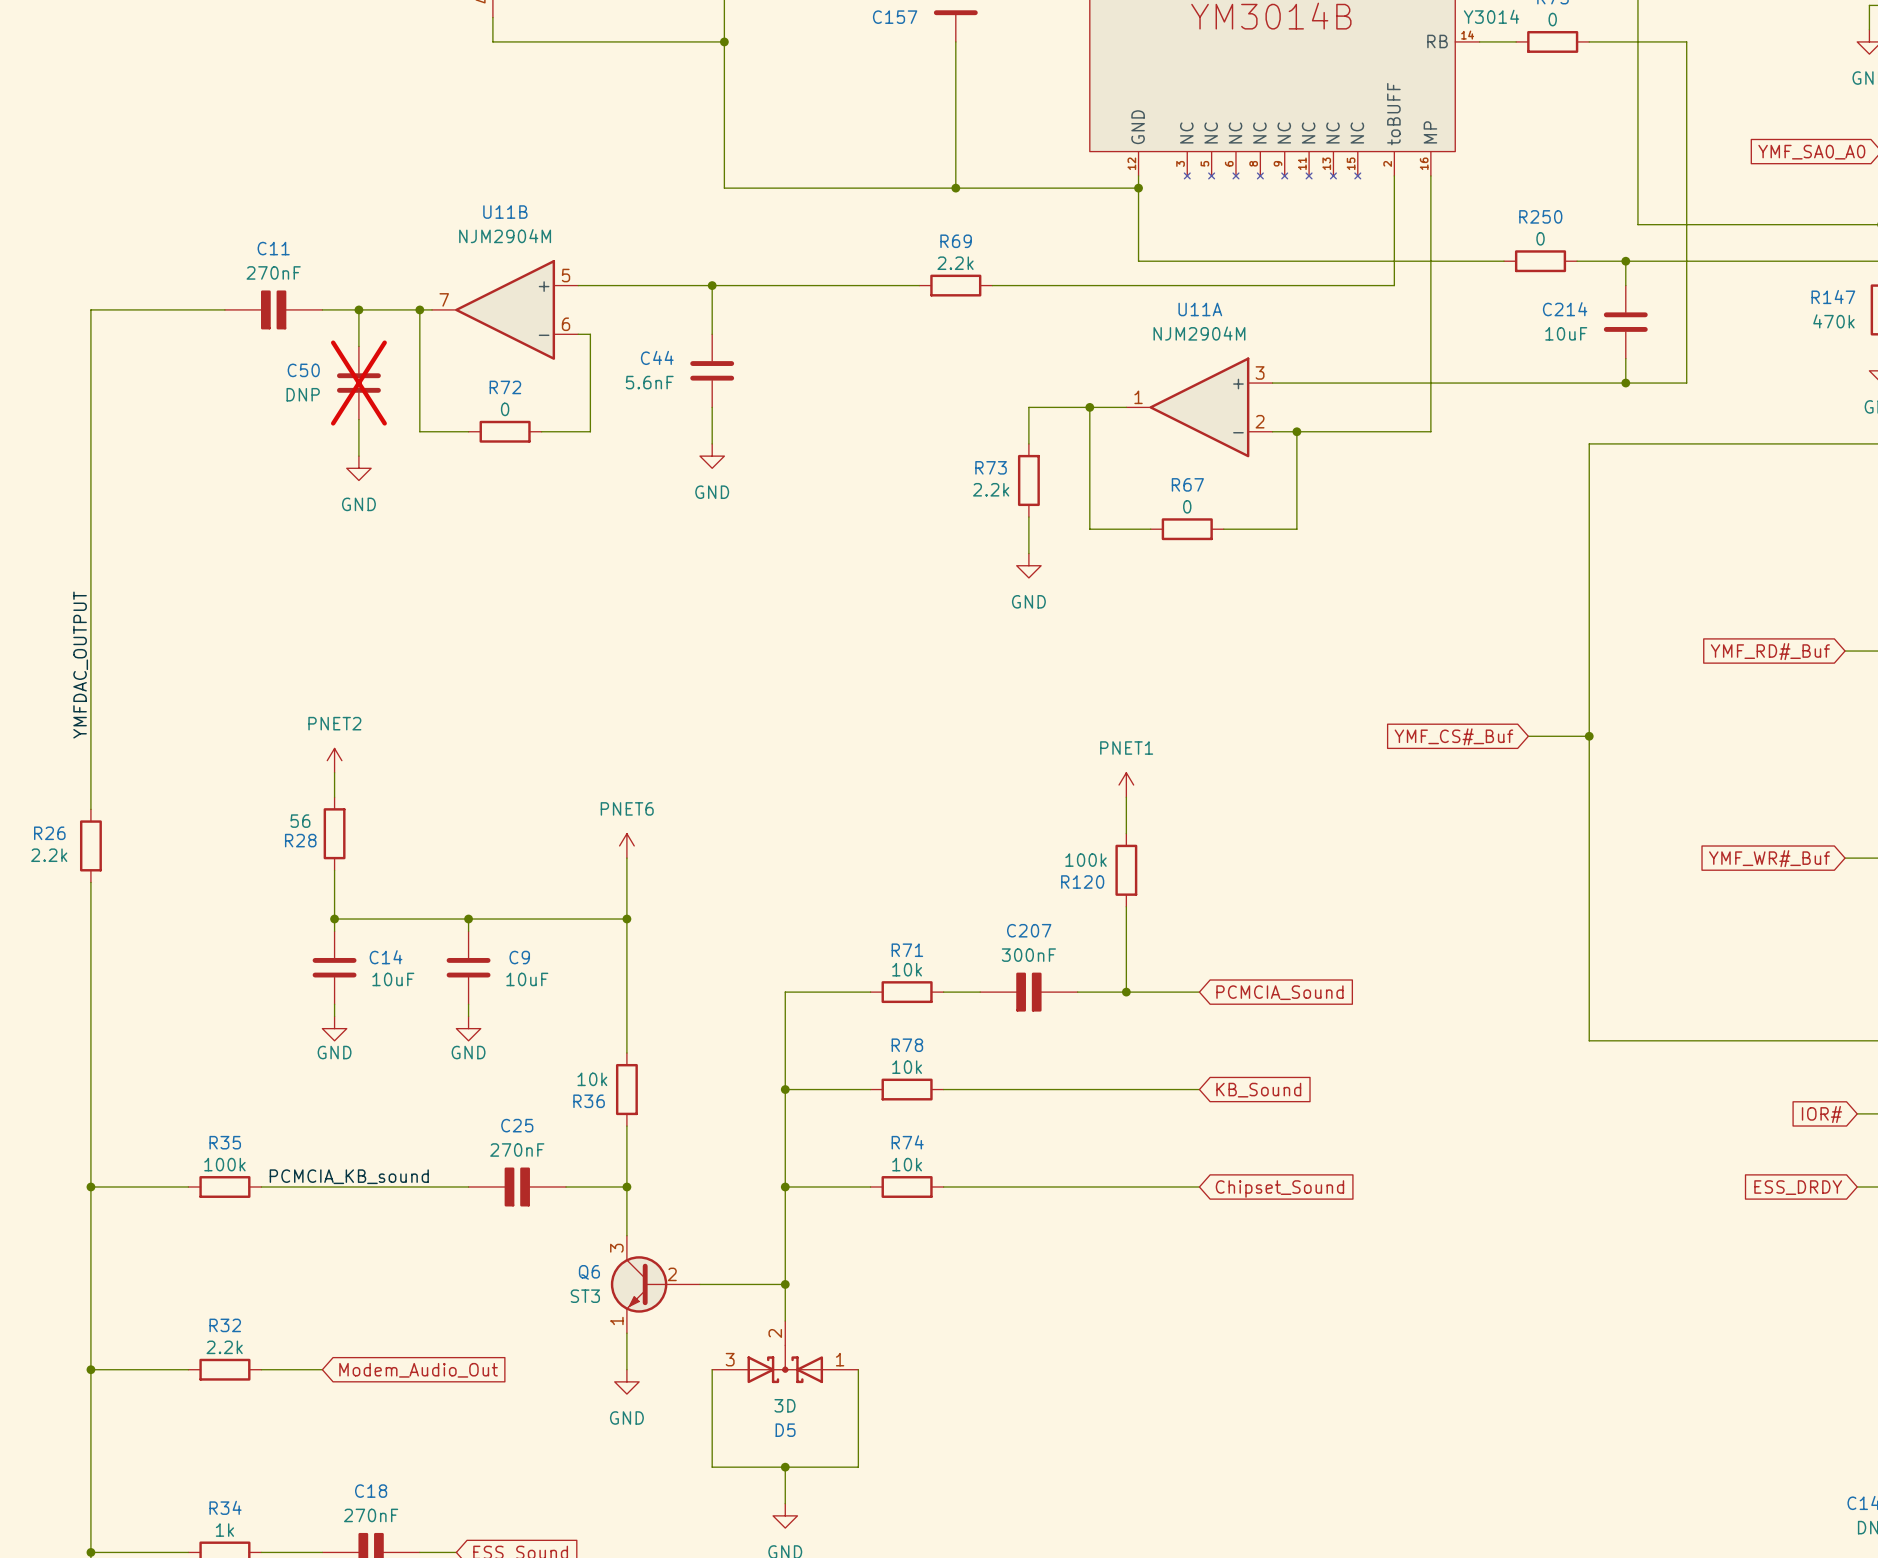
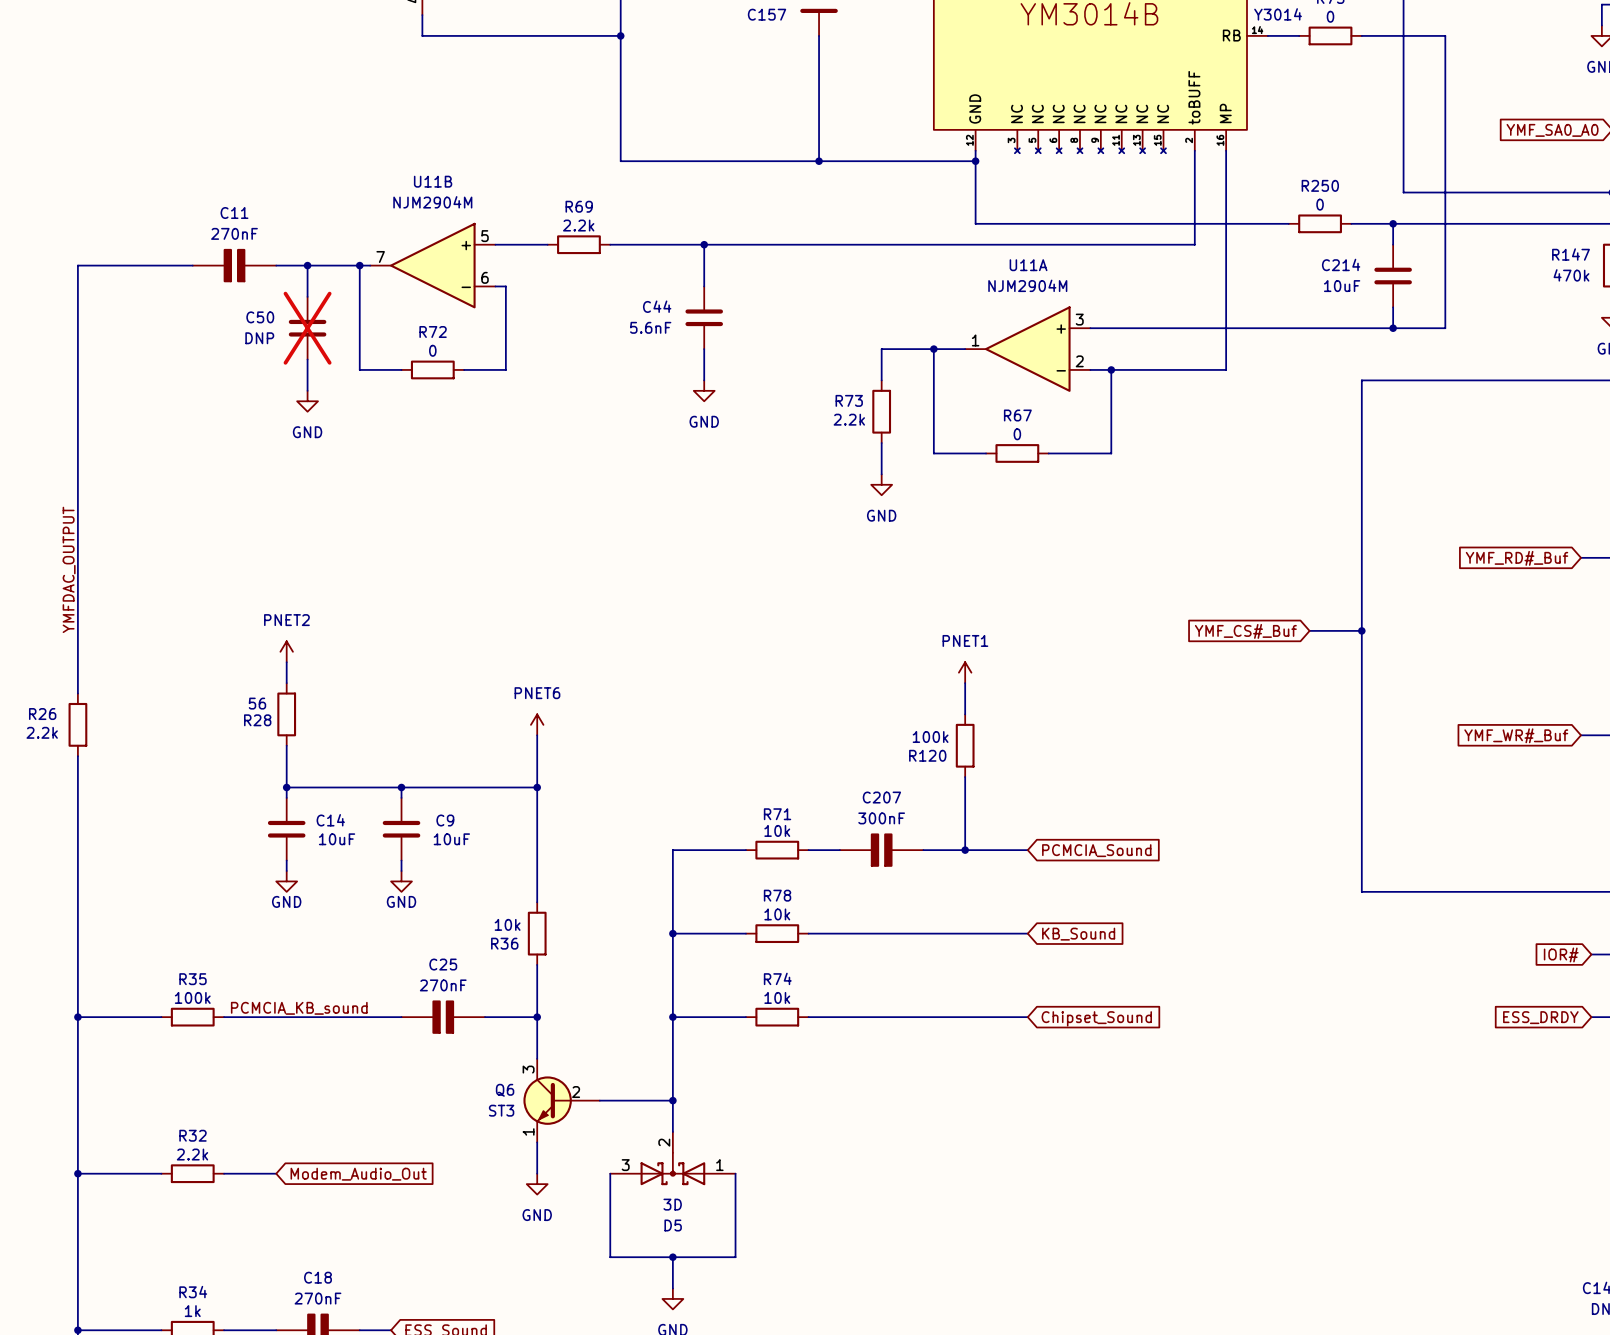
wire: (639, 285) (712, 285) (712, 334) -> none
junction: (712, 285) -> none
wire: none -> (704, 244) (704, 286)
junction: none -> (704, 244)
wire: none -> (787, 244) (850, 244)
R69 position: (955, 285) -> (578, 244)
C44 position: (712, 370) -> (704, 317)
wire: (712, 407) (712, 443) -> (704, 349) (704, 380)
power symbol position: GND (712, 456) -> GND (704, 390)

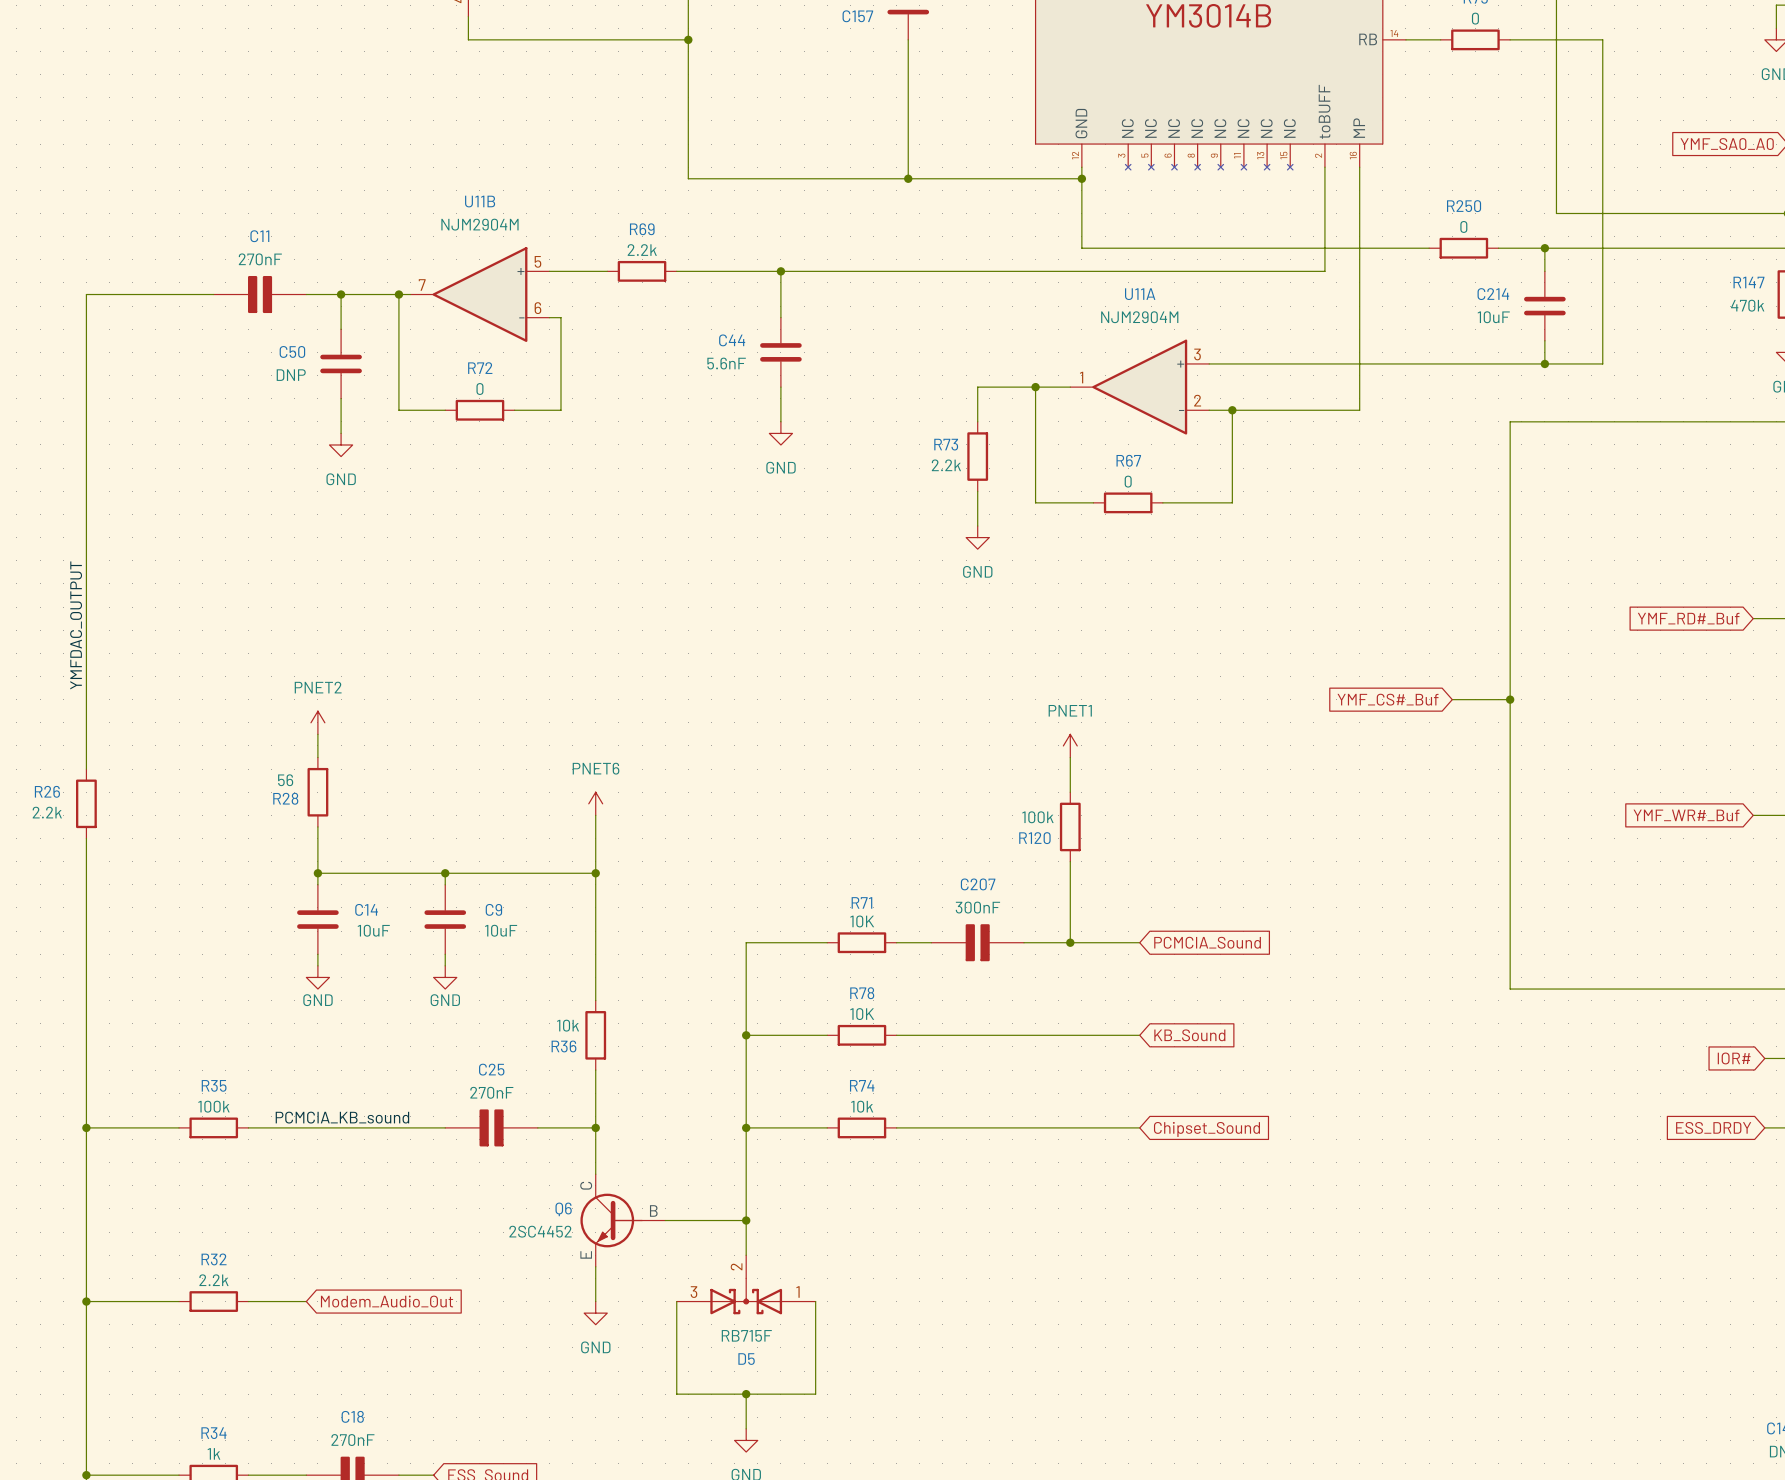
part value: Y3014 (1278, 14) -> none
C50 do-not-place cross: (307, 328) -> none
R71 value: 10k (777, 830) -> 10K (862, 921)
R78 value: 10k (777, 914) -> 10K (862, 1014)
Q6 symbol: [523, 1058, 600, 1143] -> [580, 1174, 666, 1267]
Q6 value: ST3 (501, 1110) -> 2SC4452 (540, 1231)
D5 value: 3D (672, 1204) -> RB715F (746, 1335)

